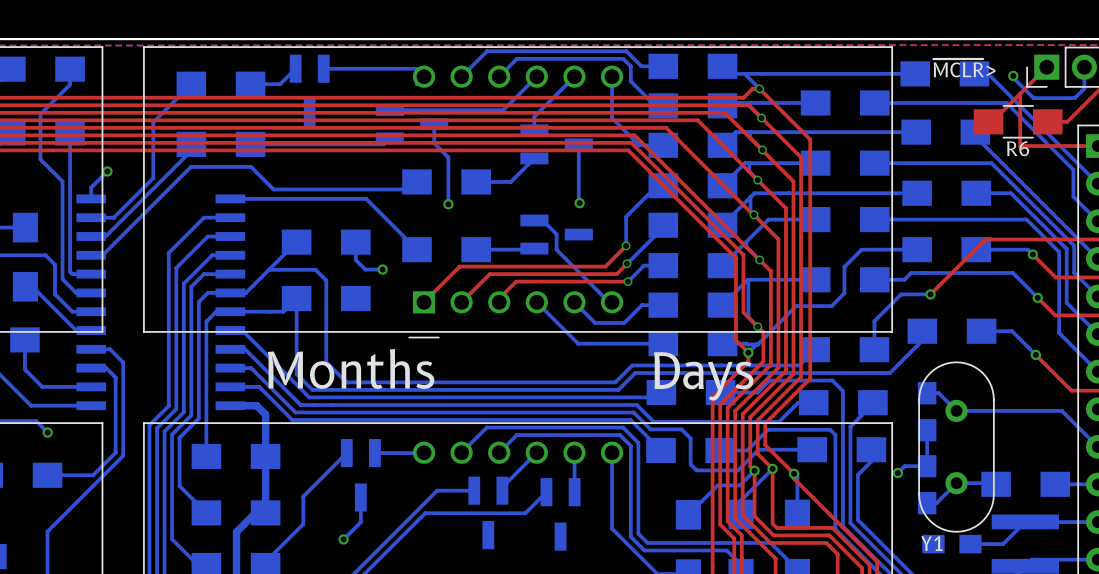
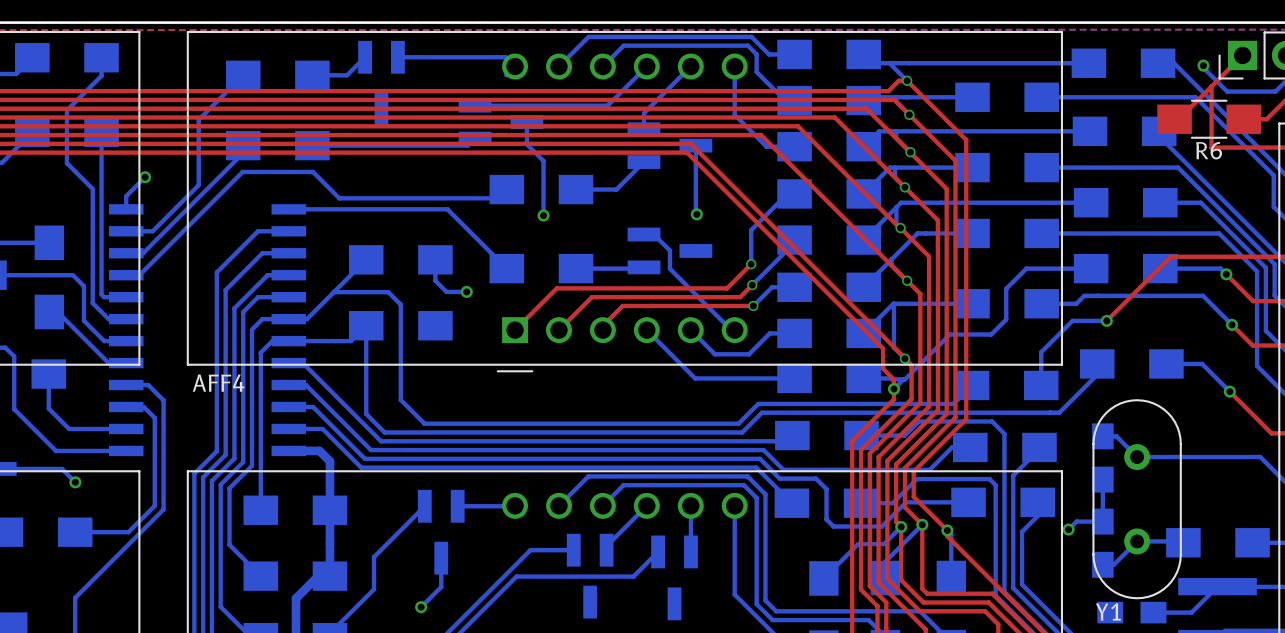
text: ~{MCLR}> (964, 68) -> none
top track: (574, 142) (631, 142) (743, 254) (743, 312) (757, 326) -> (690, 143) (904, 358)
top track: (571, 150) (628, 150) (735, 257) (735, 340) (748, 352) -> (687, 152) (883, 348) (883, 368) (893, 379) (893, 388)
AFF4 name: none -> AFF4 (218, 383)
text: Months (351, 368) -> none
text: Days (703, 376) -> none

